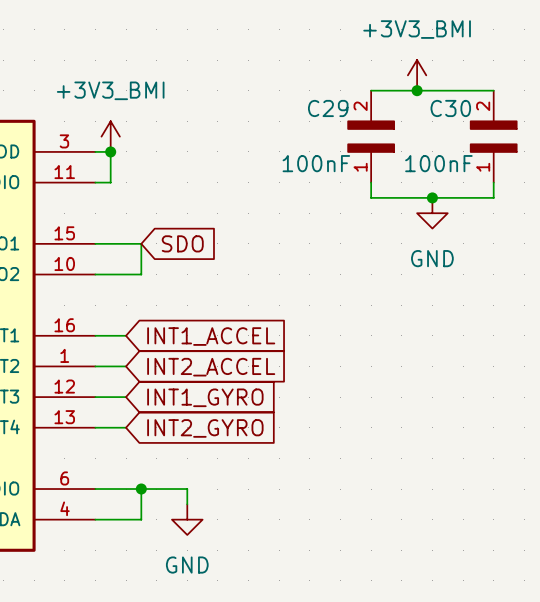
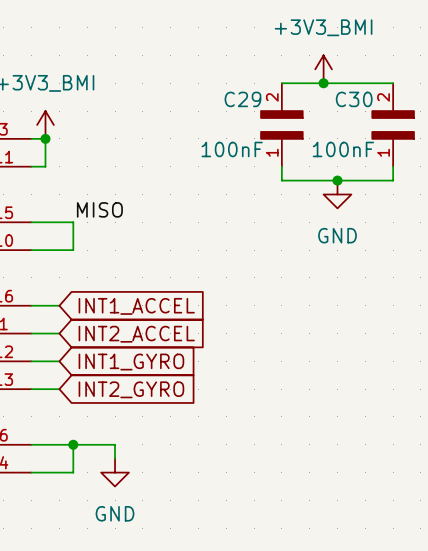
label: none -> MISO (99, 209)
global label: SDO (182, 243) -> none

